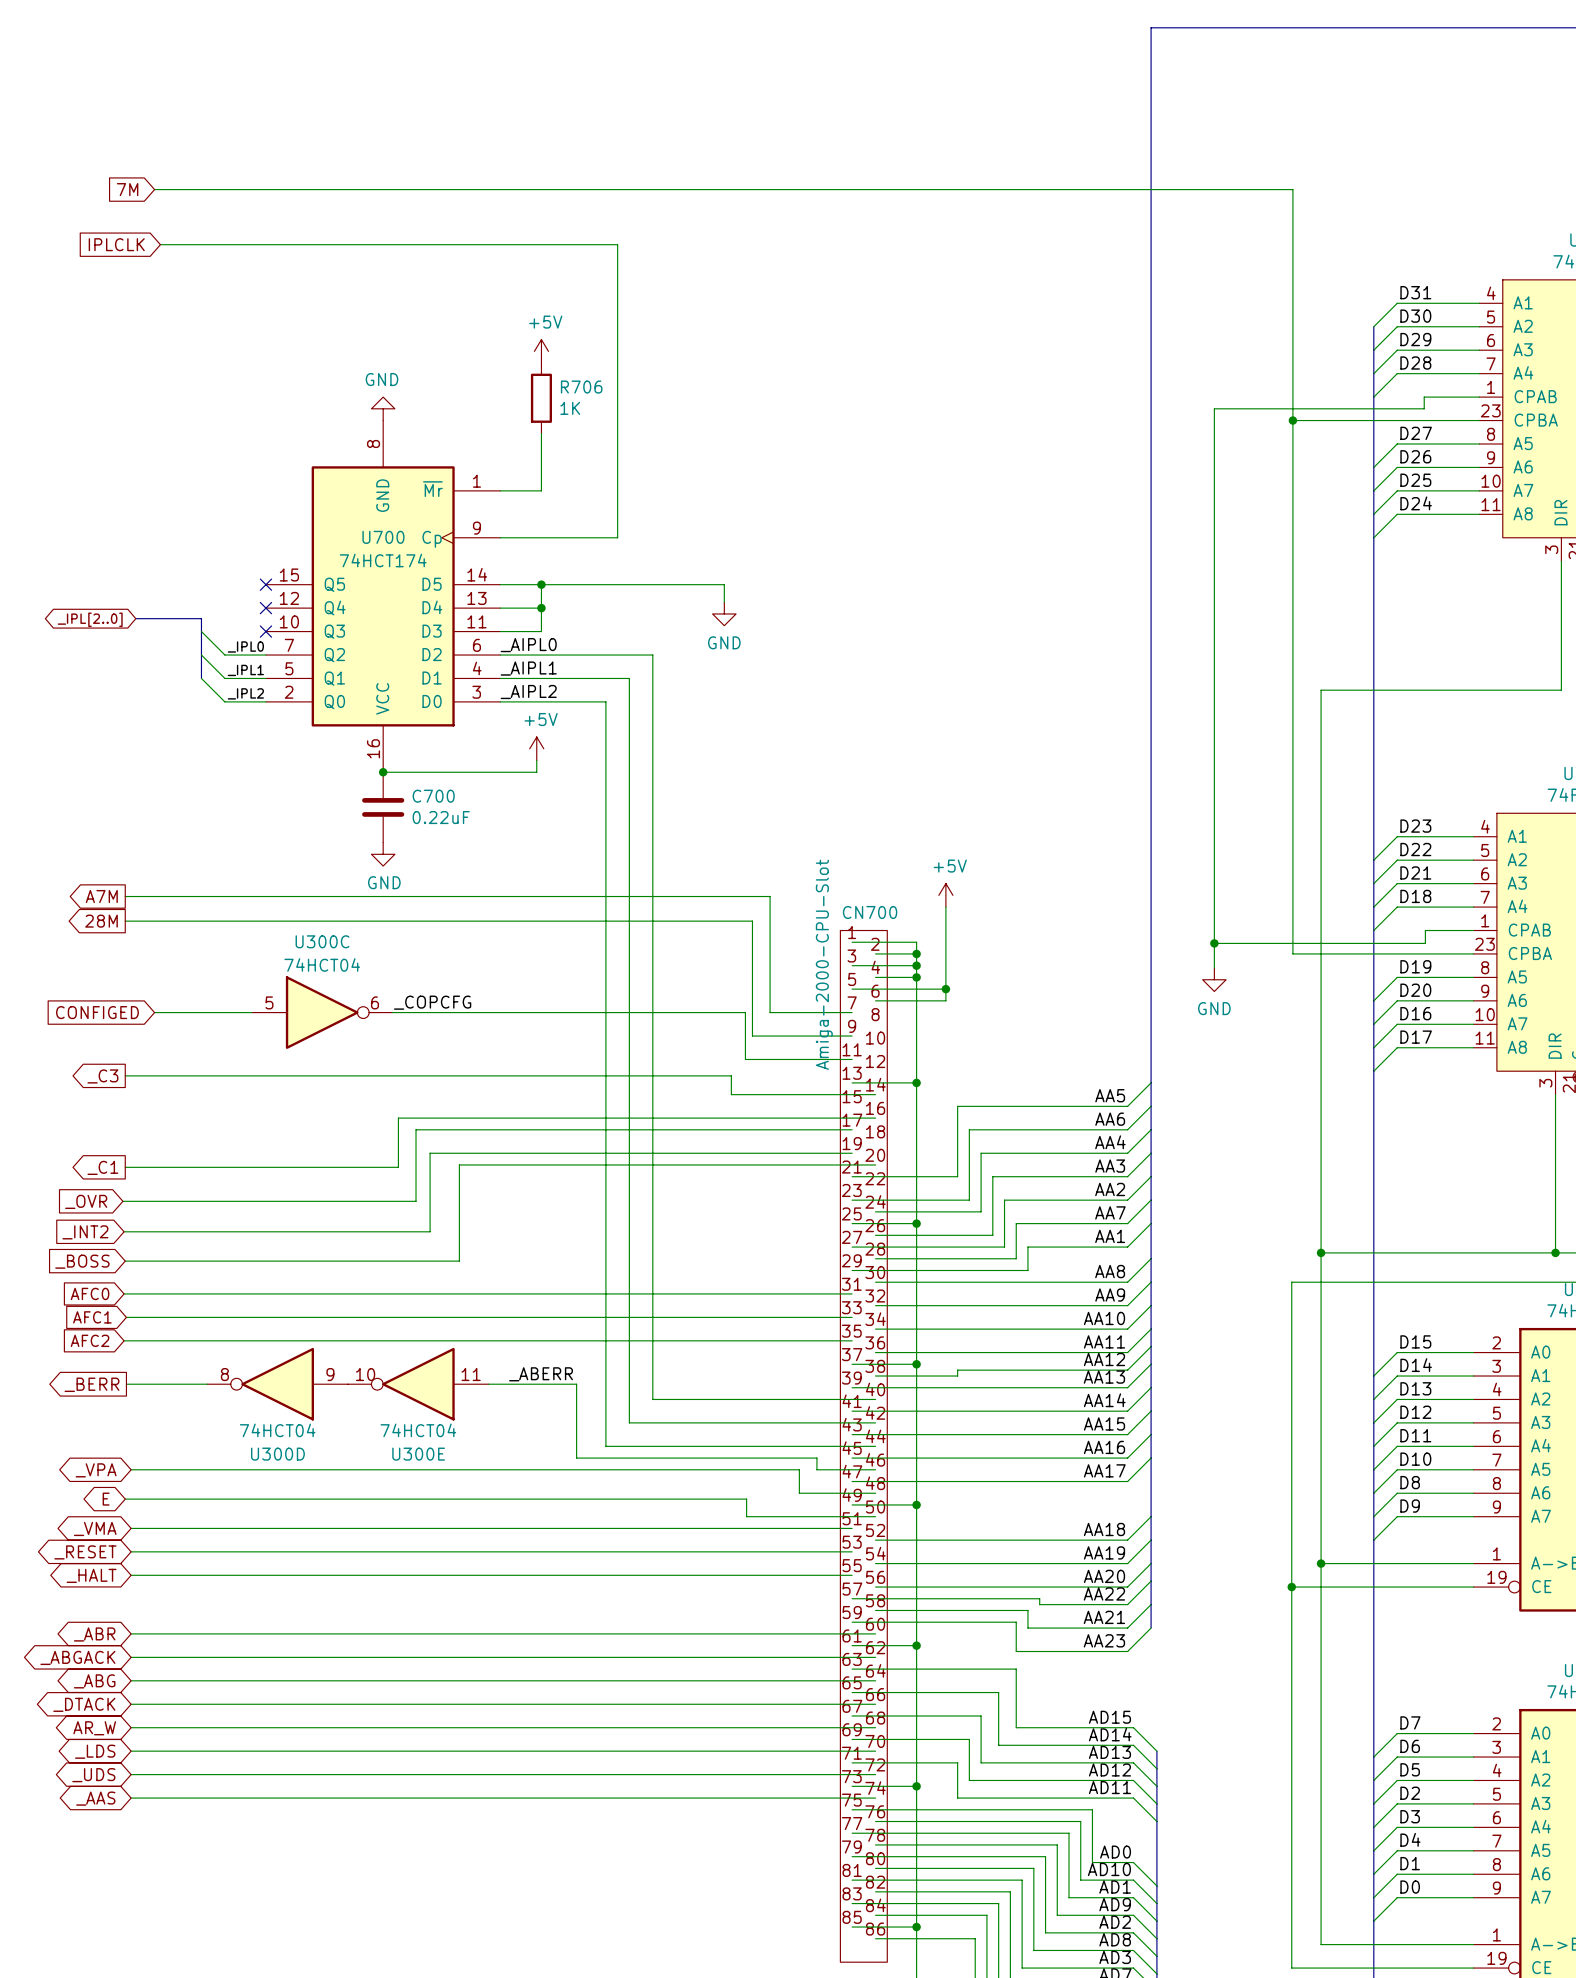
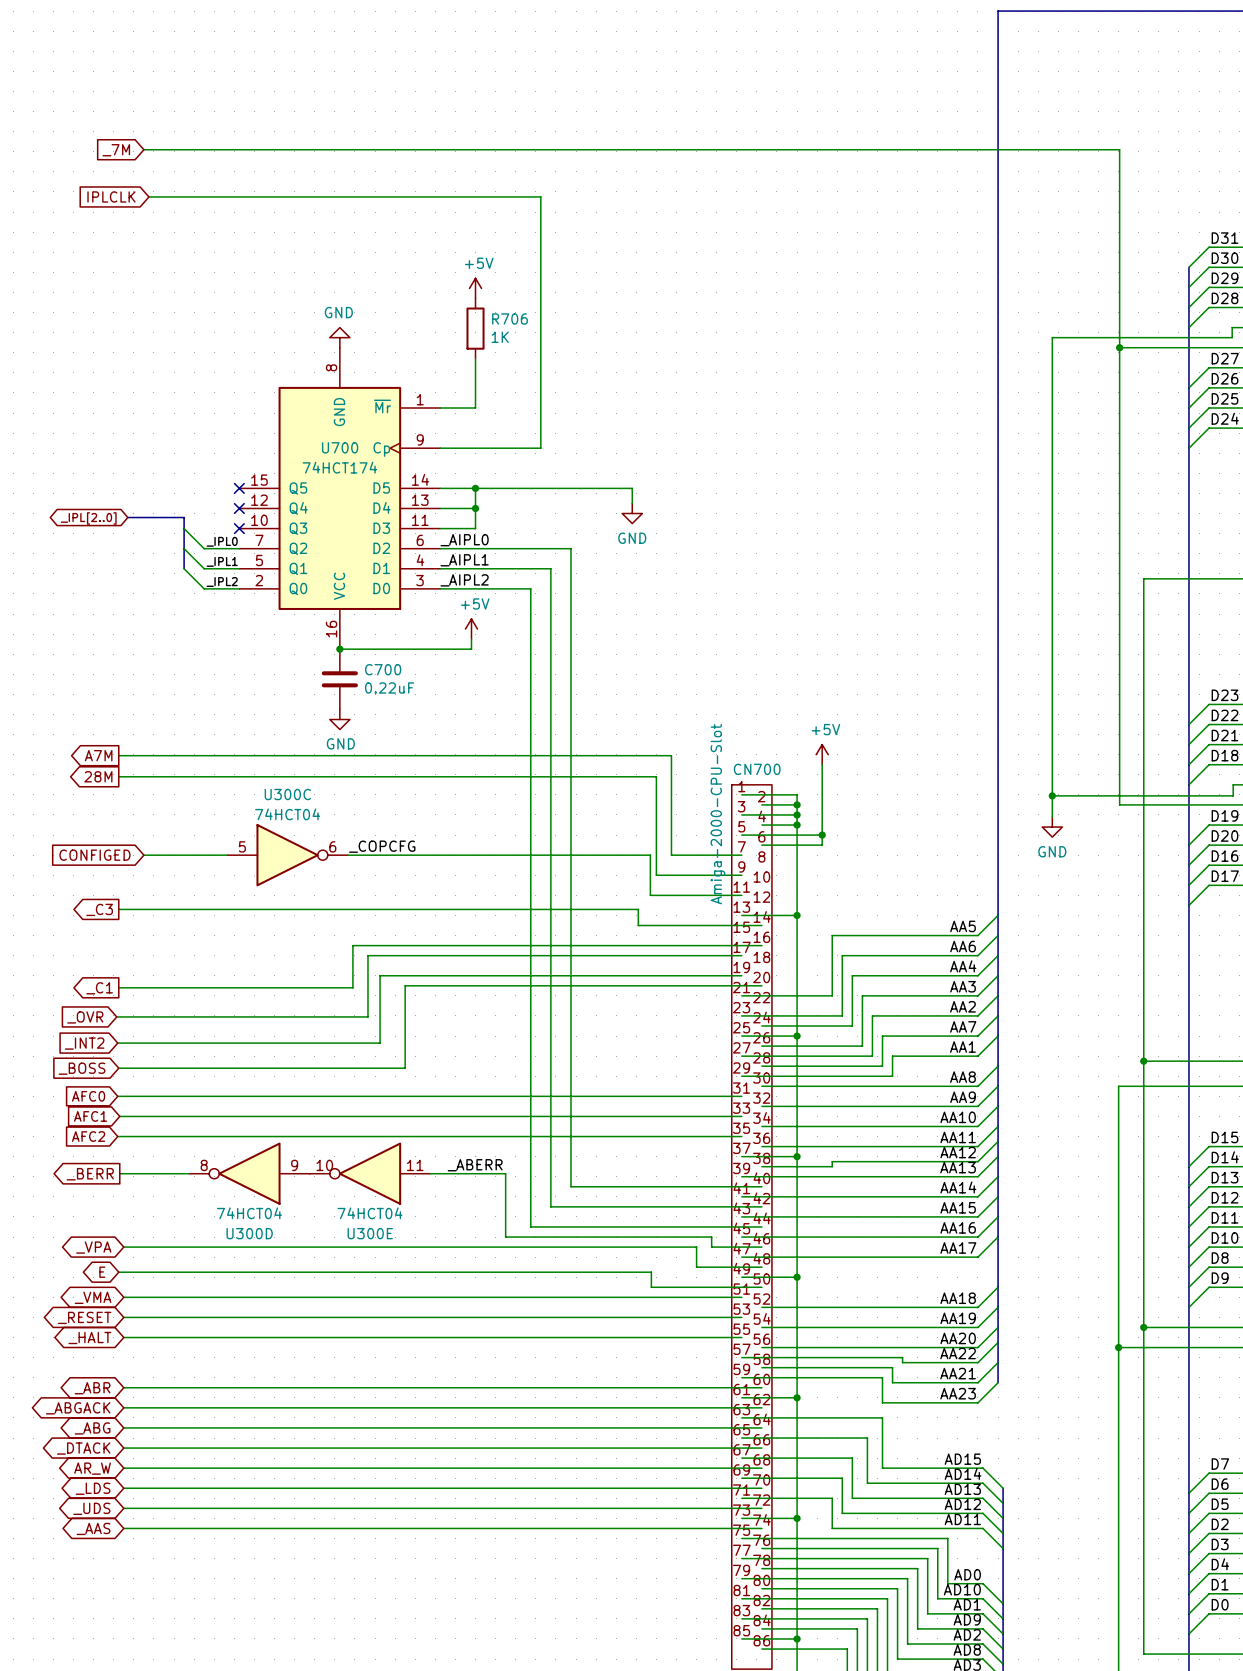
global label: 7M (127, 189) -> _7M (116, 150)

